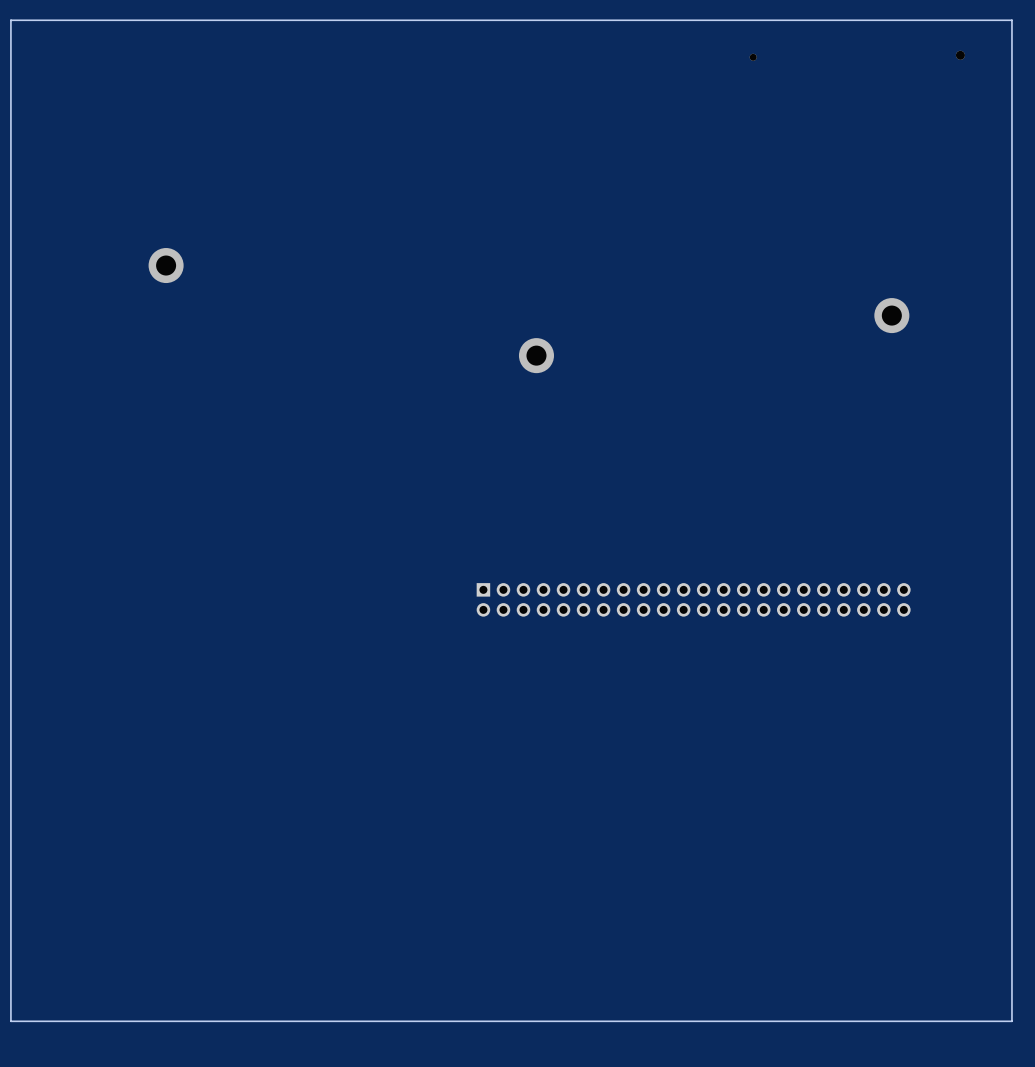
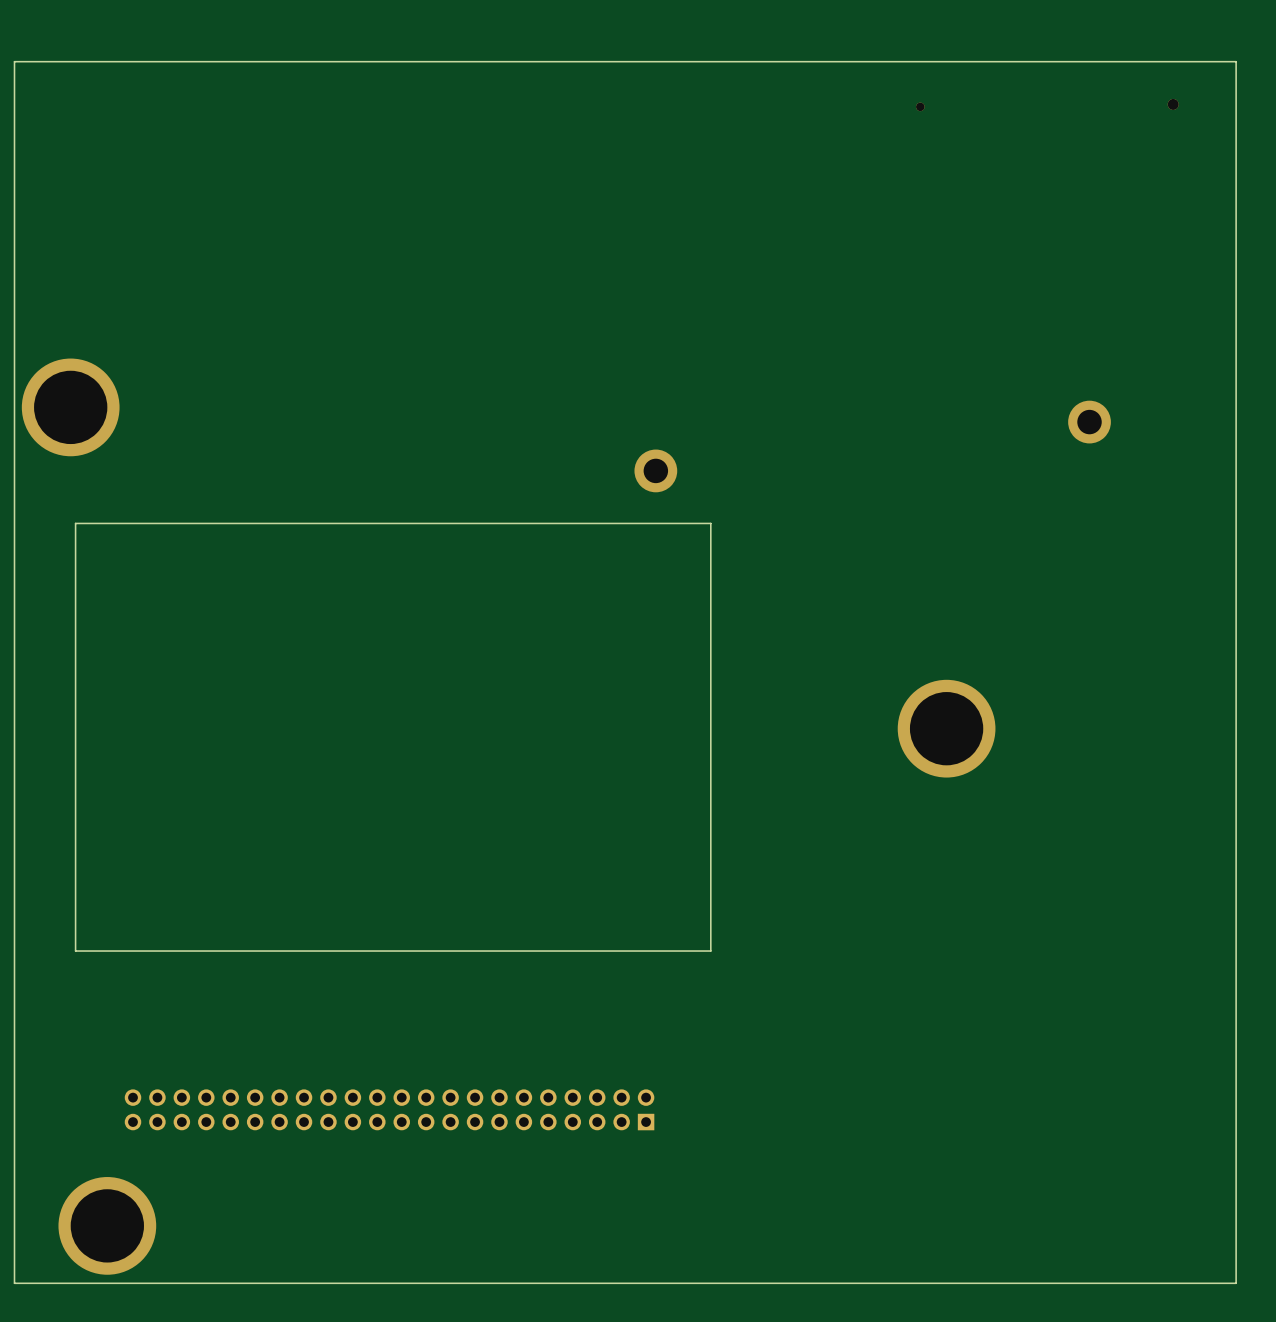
via: (166, 265) -> none
via: none -> (70, 407)
board edge: none -> (710, 523) (710, 951) (75, 951) (75, 523) (710, 523)
via: none -> (946, 728)
part: (693, 599) -> none
part: none -> (389, 1109)
via: none -> (107, 1225)

